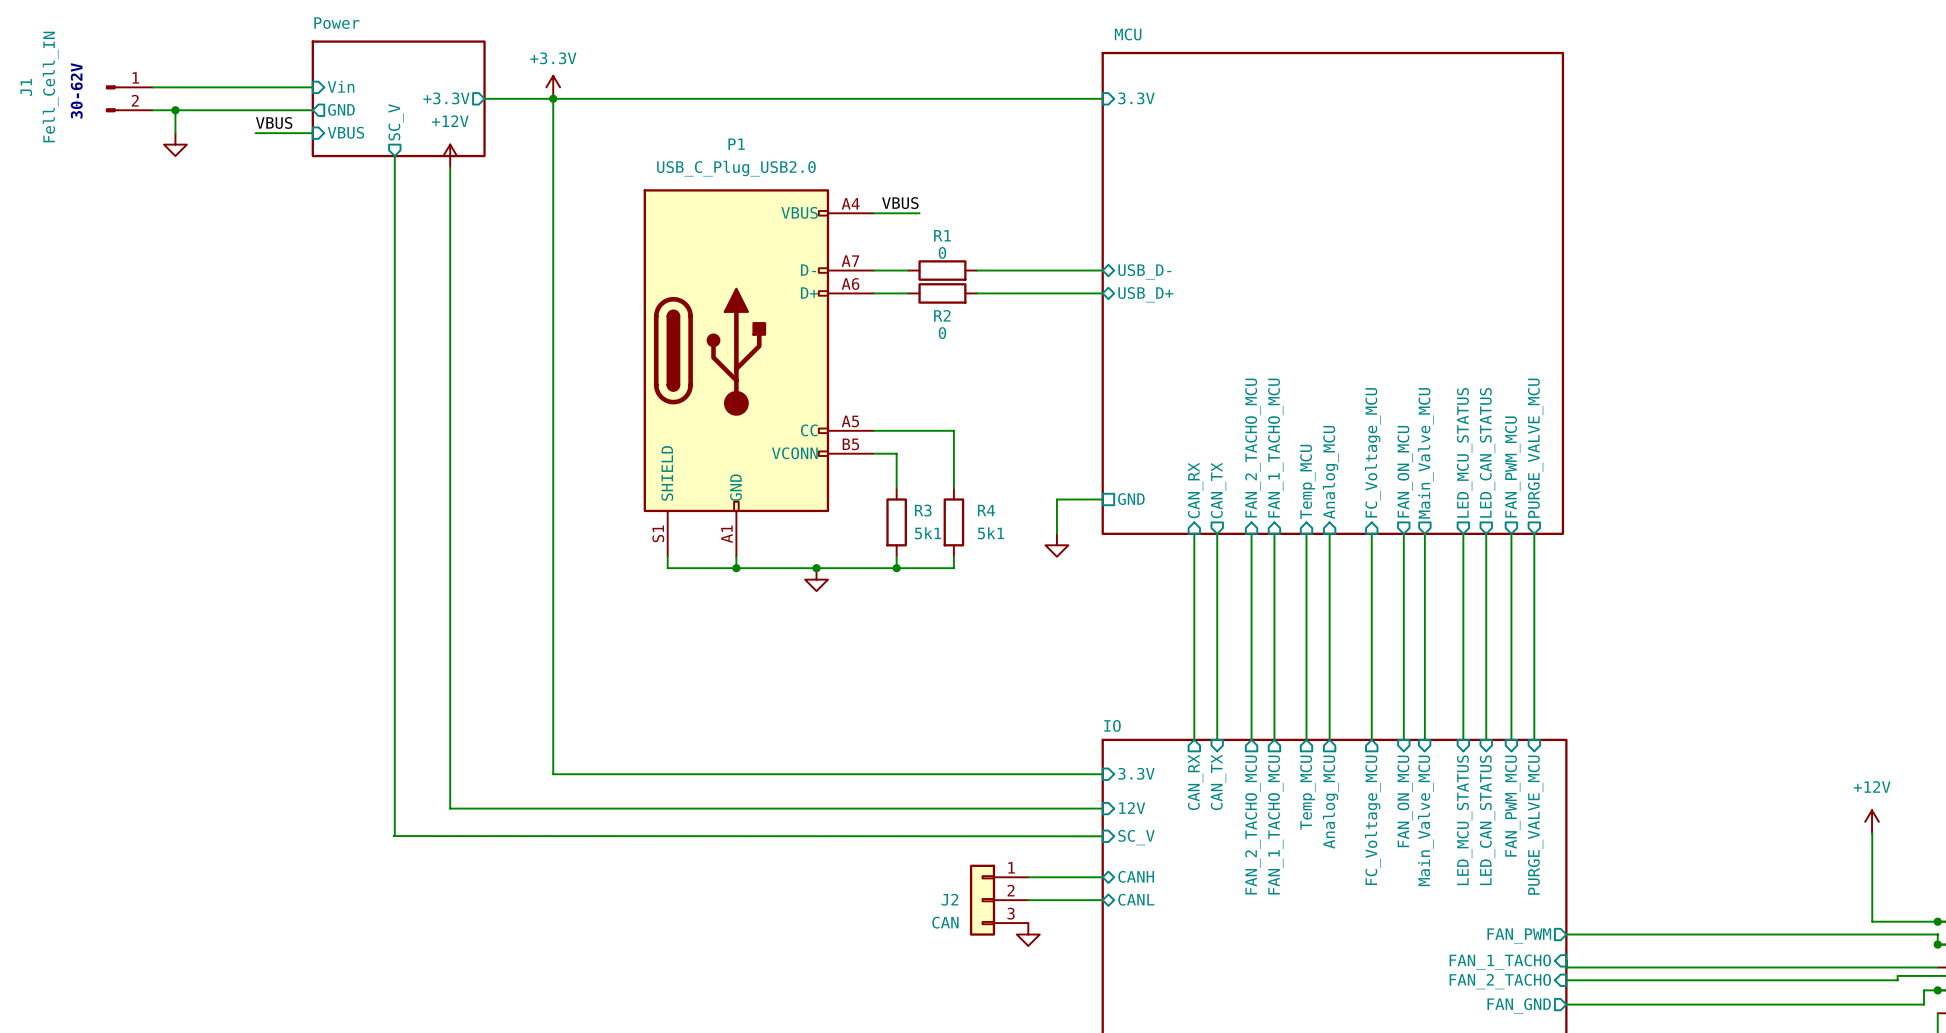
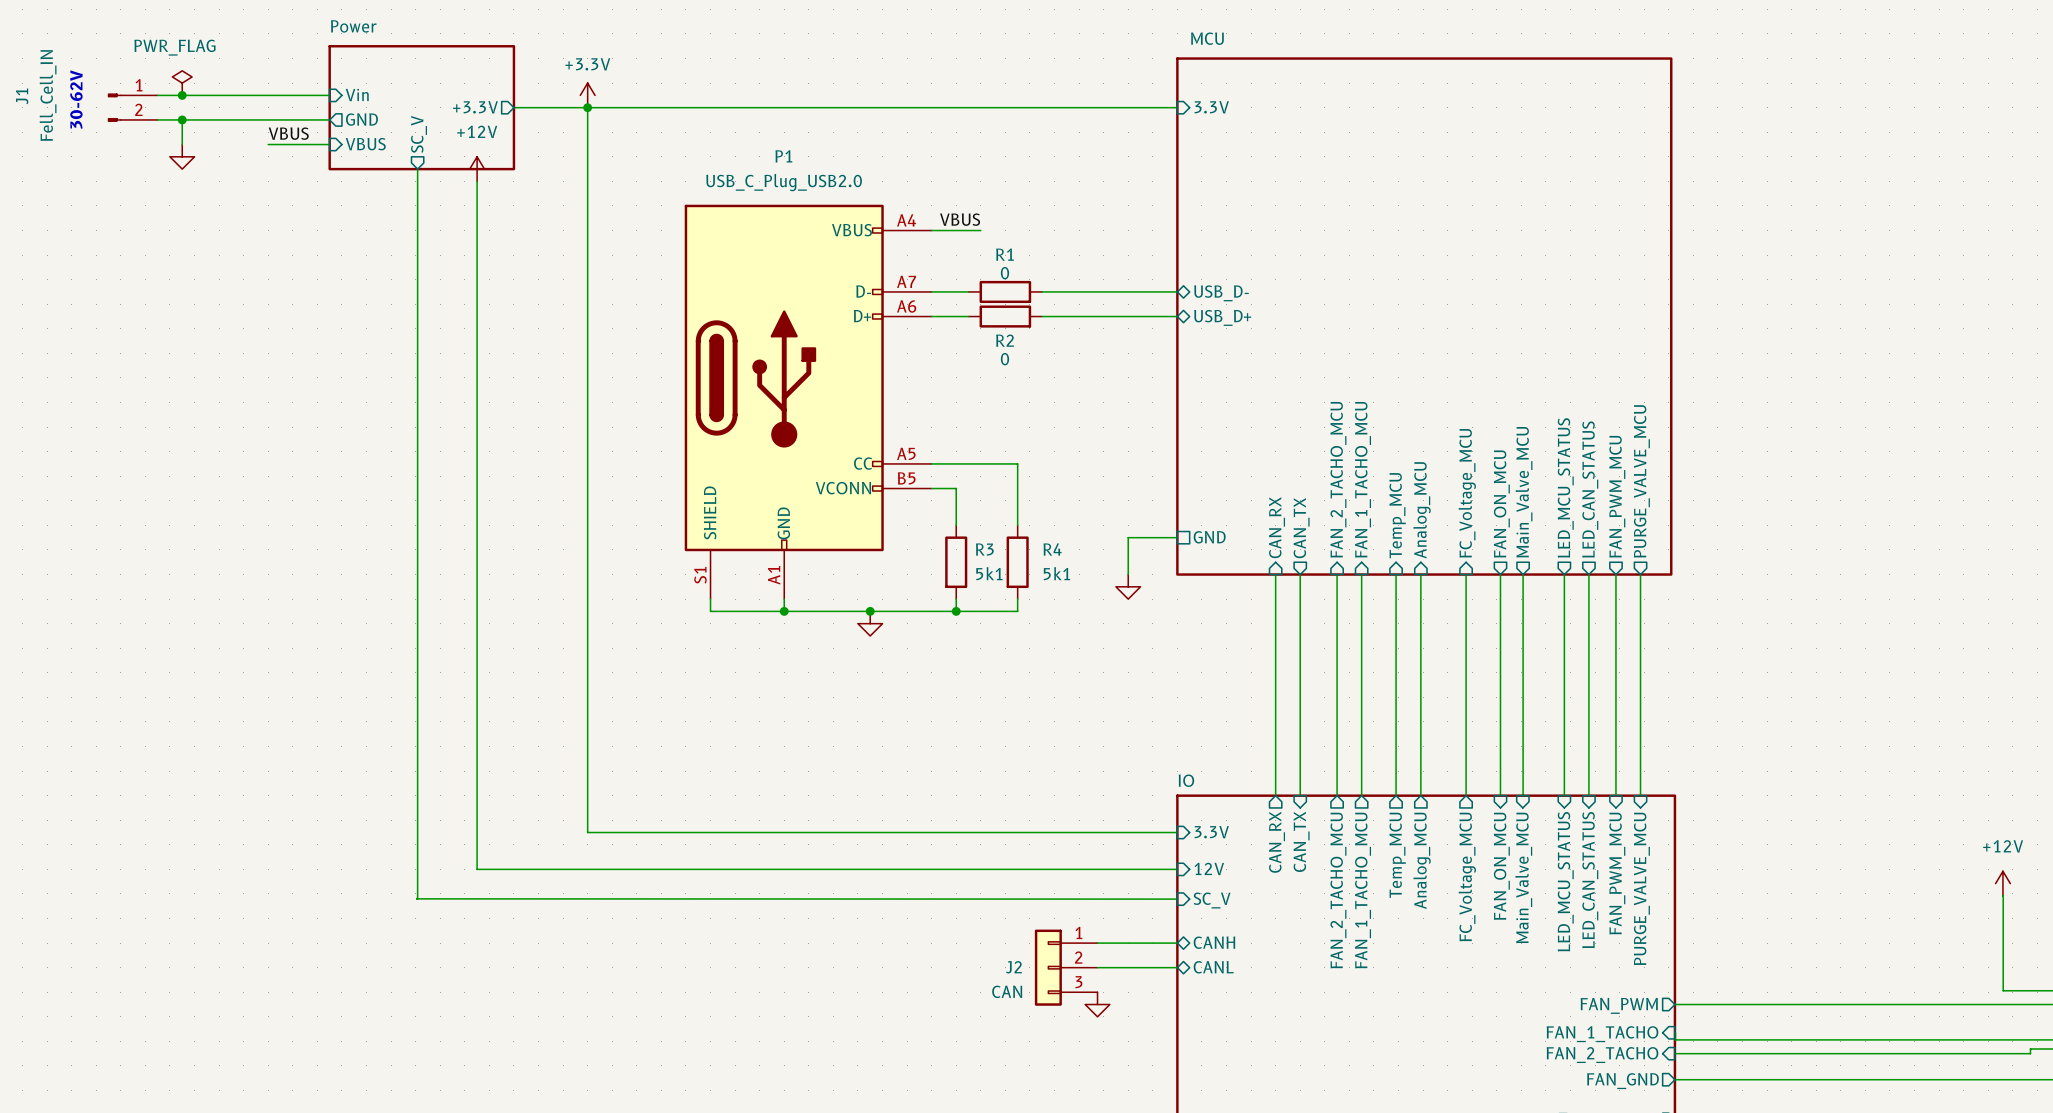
power symbol: none -> PWR_FLAG (182, 83)
junction: none -> (182, 95)

